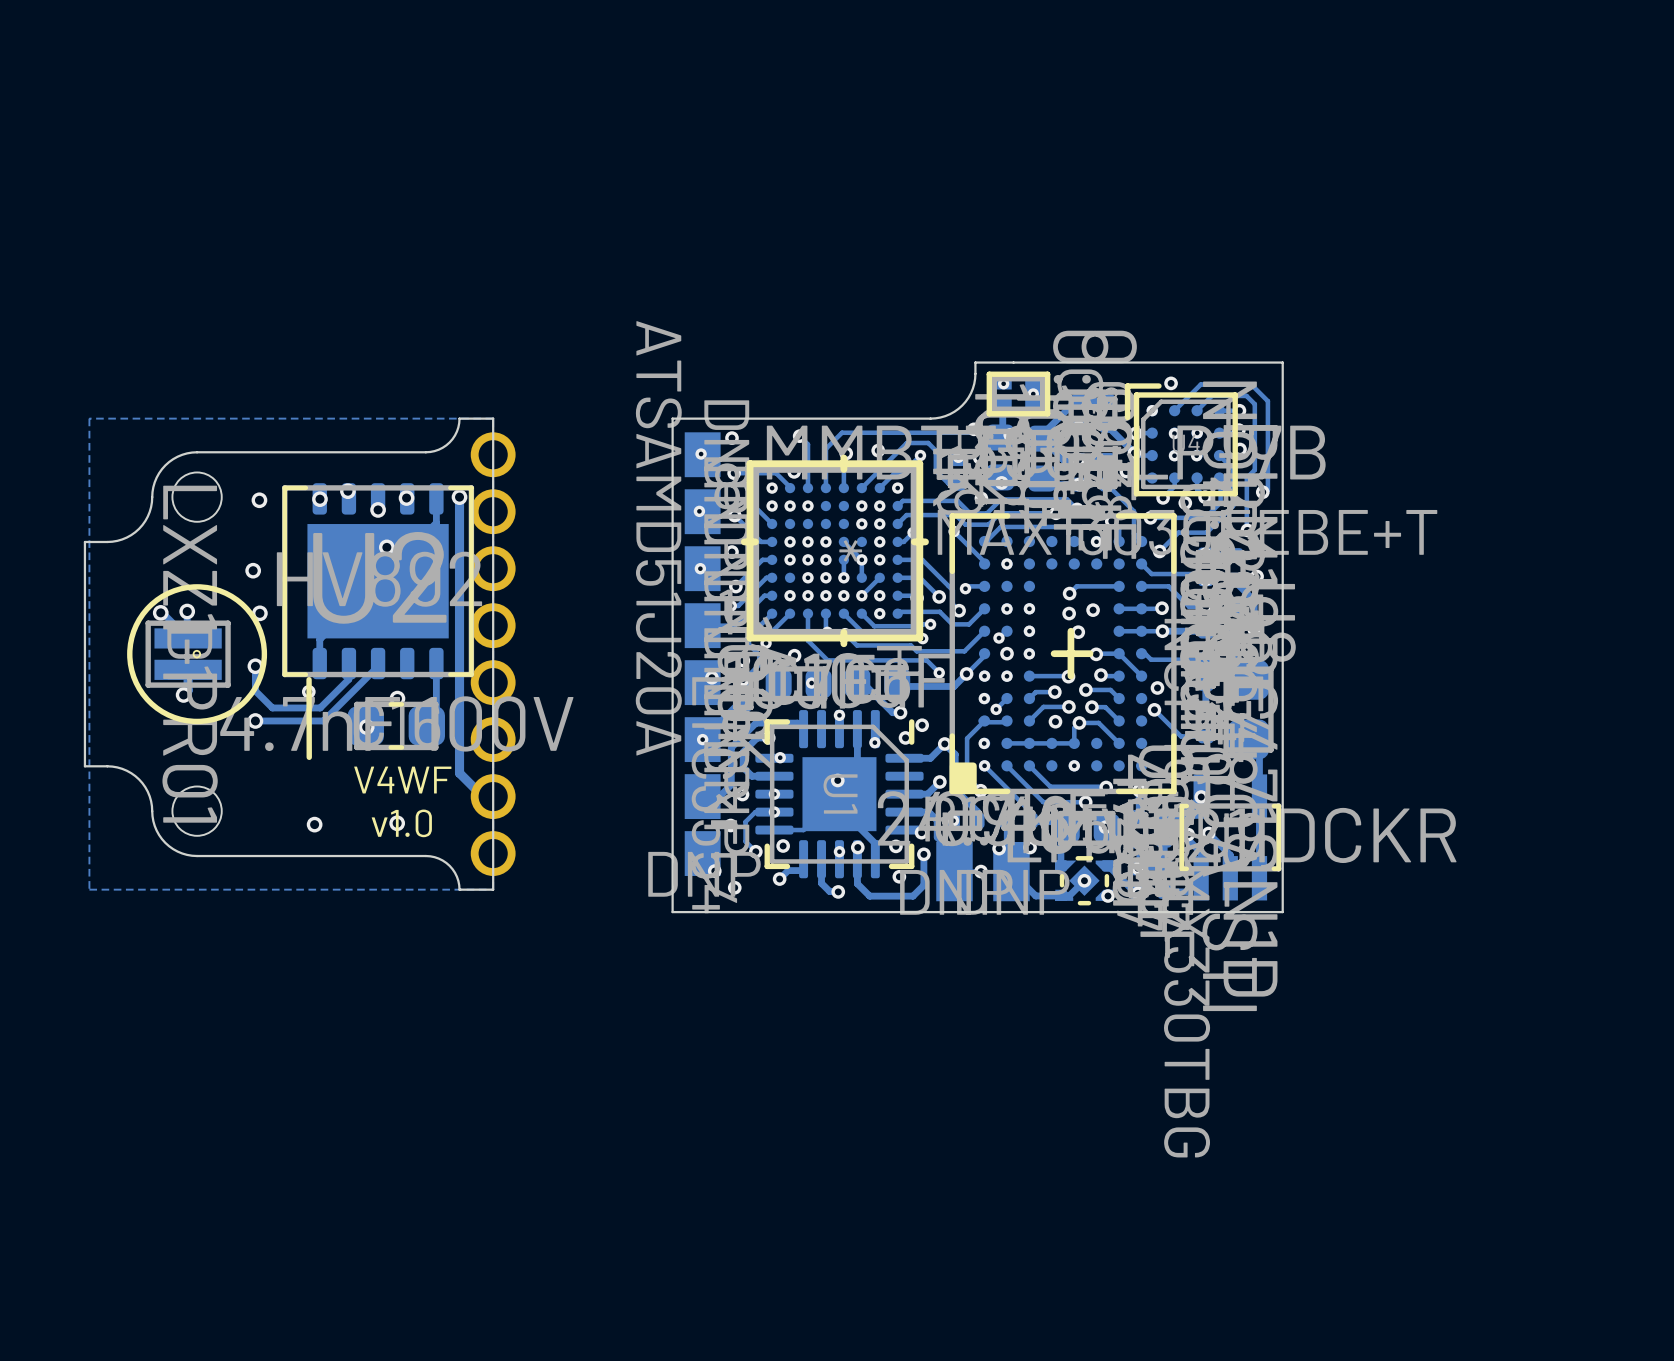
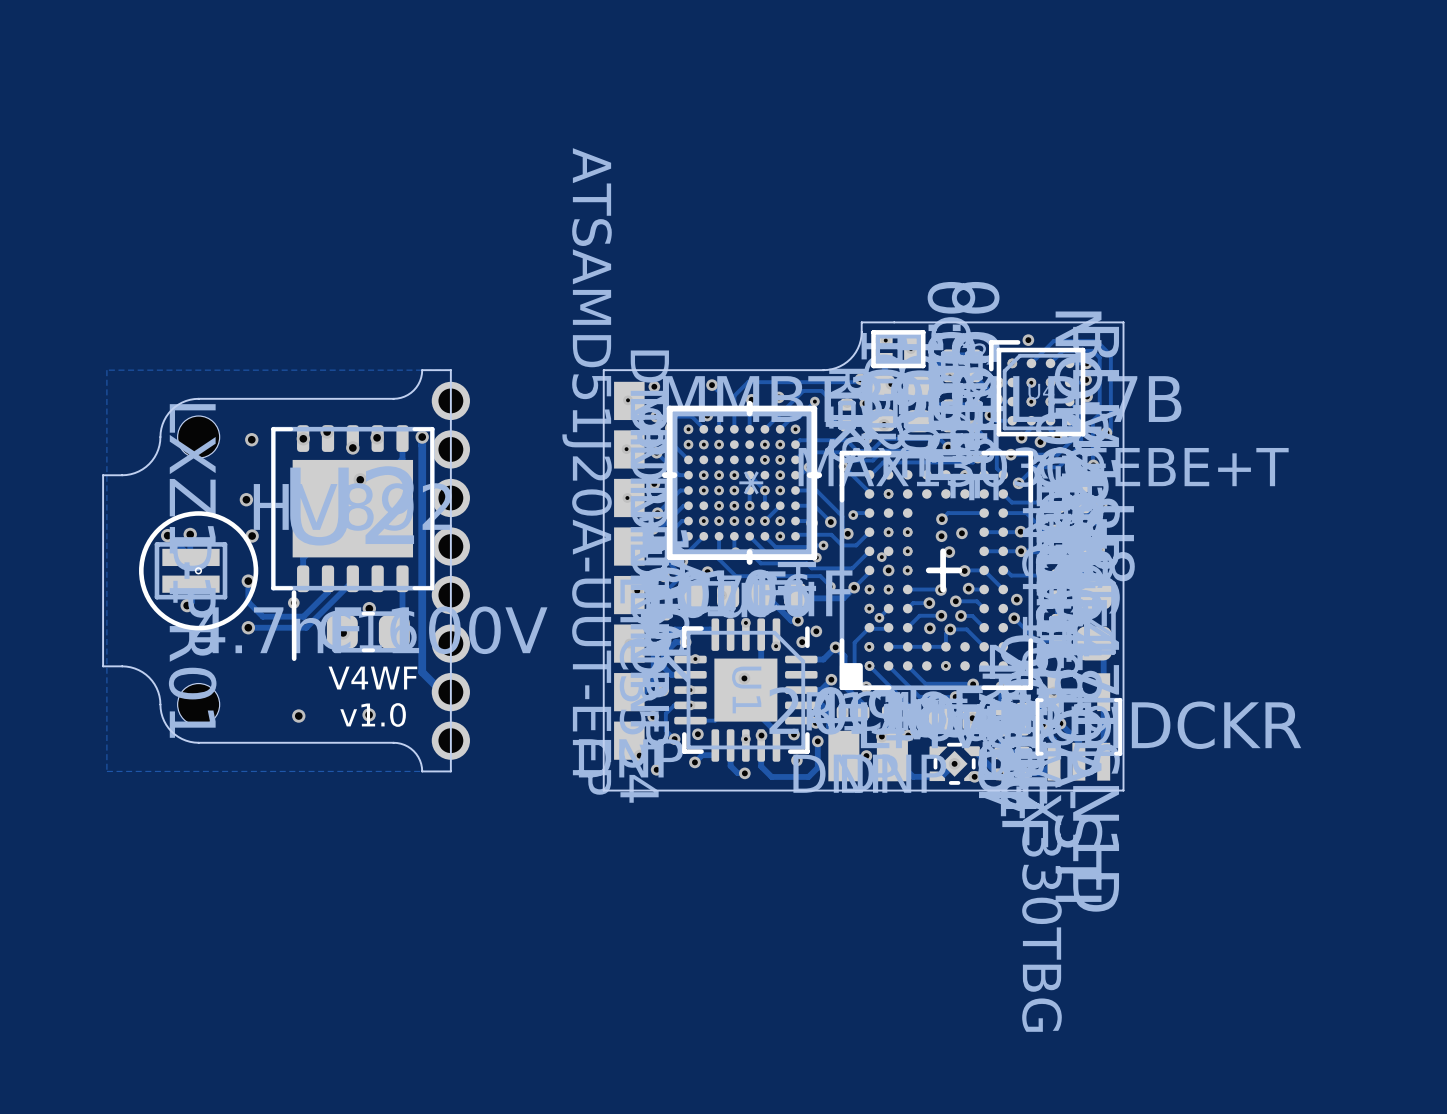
part value: ATSAMD51J20A (658, 538) -> ATSAMD51J20A-UUT-EFP (587, 471)

